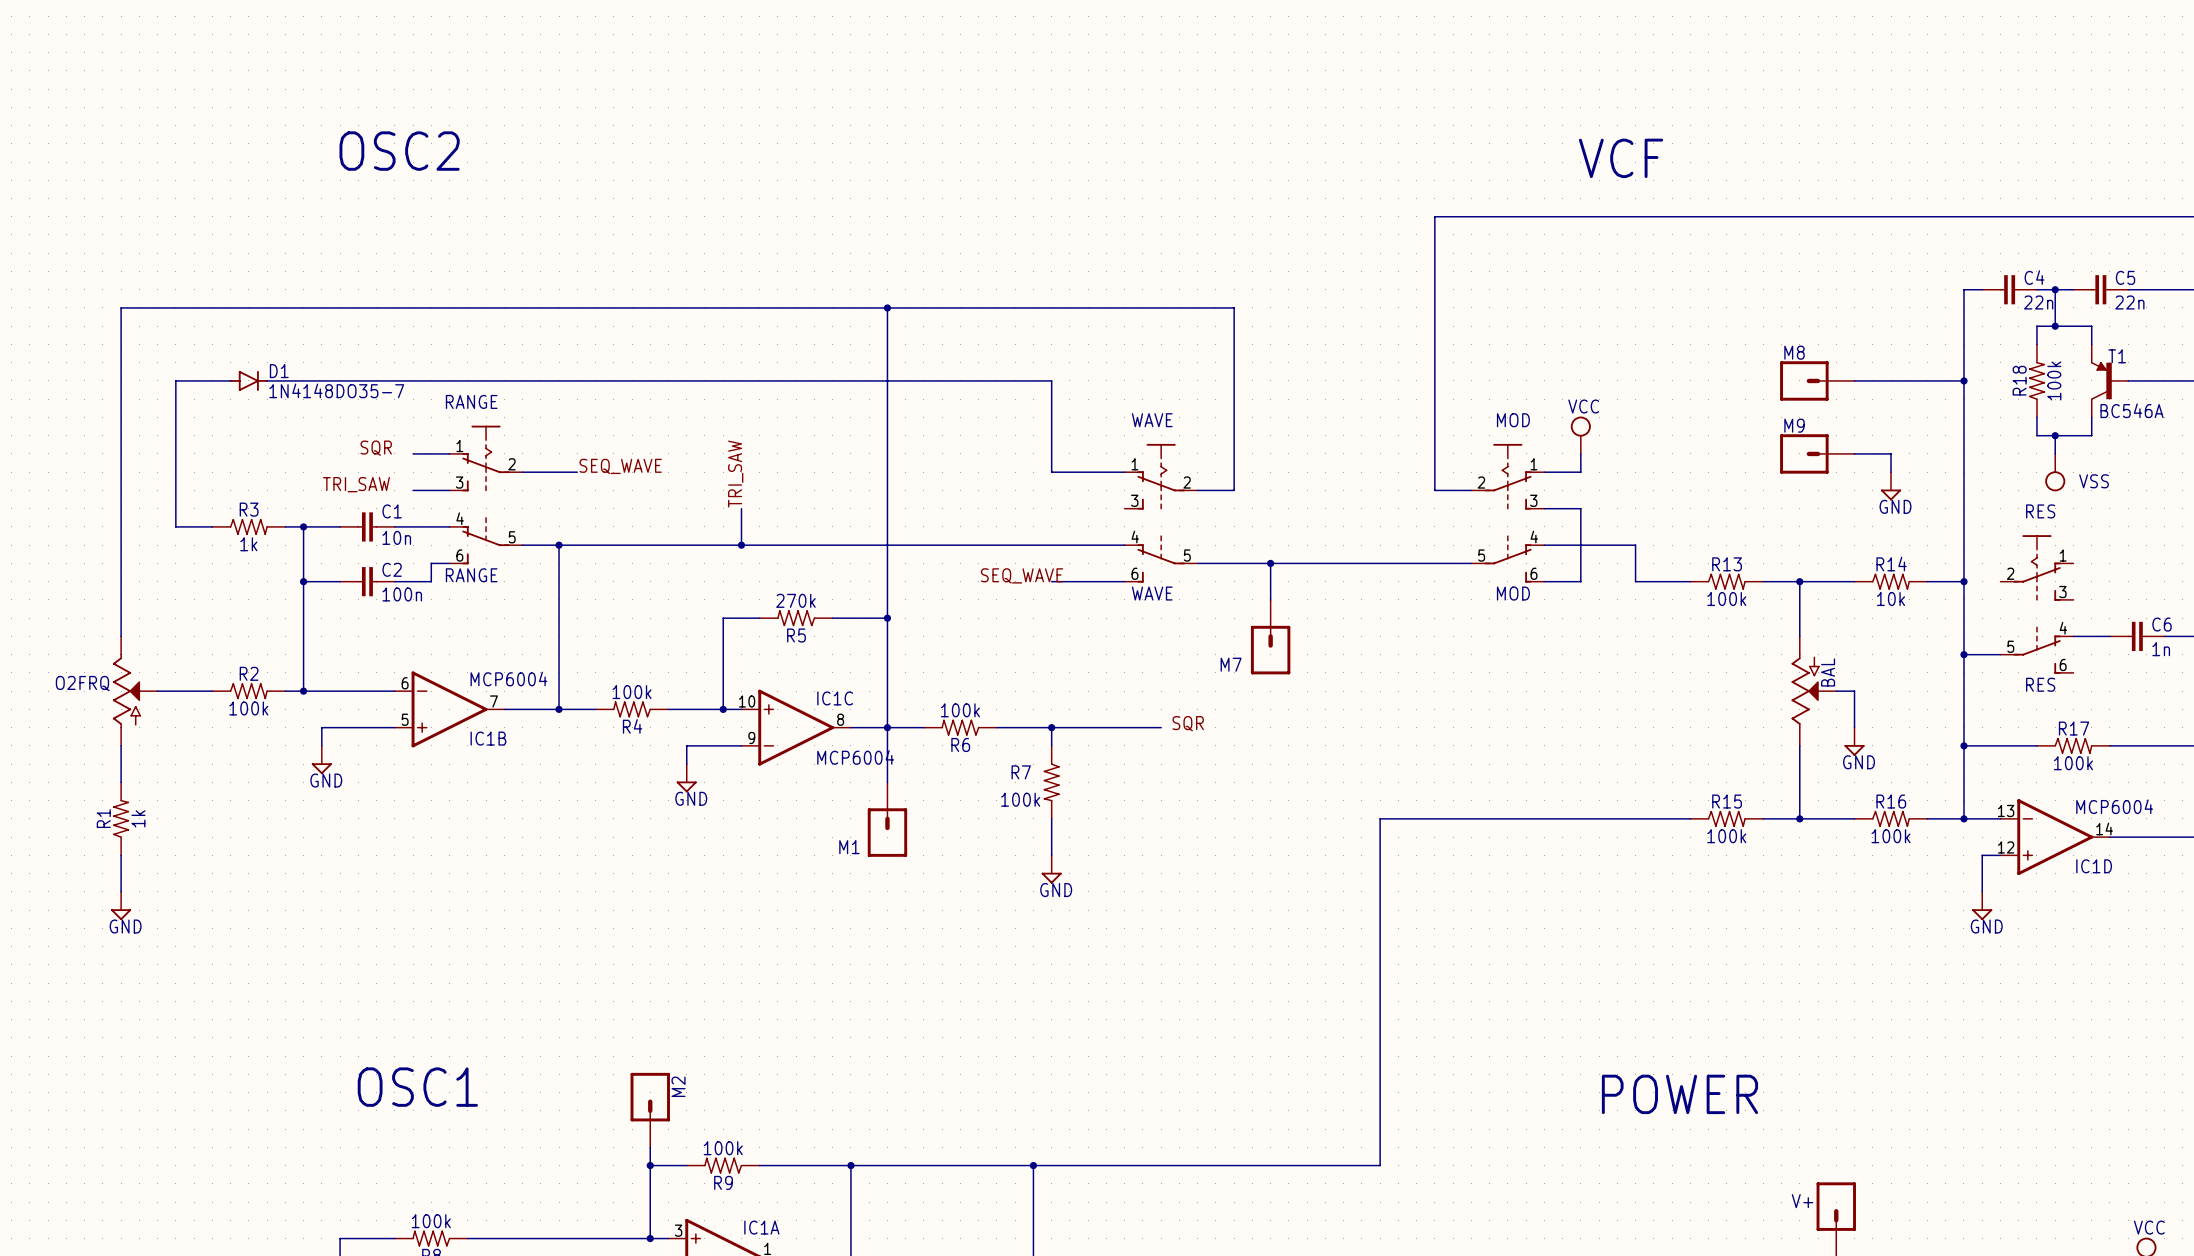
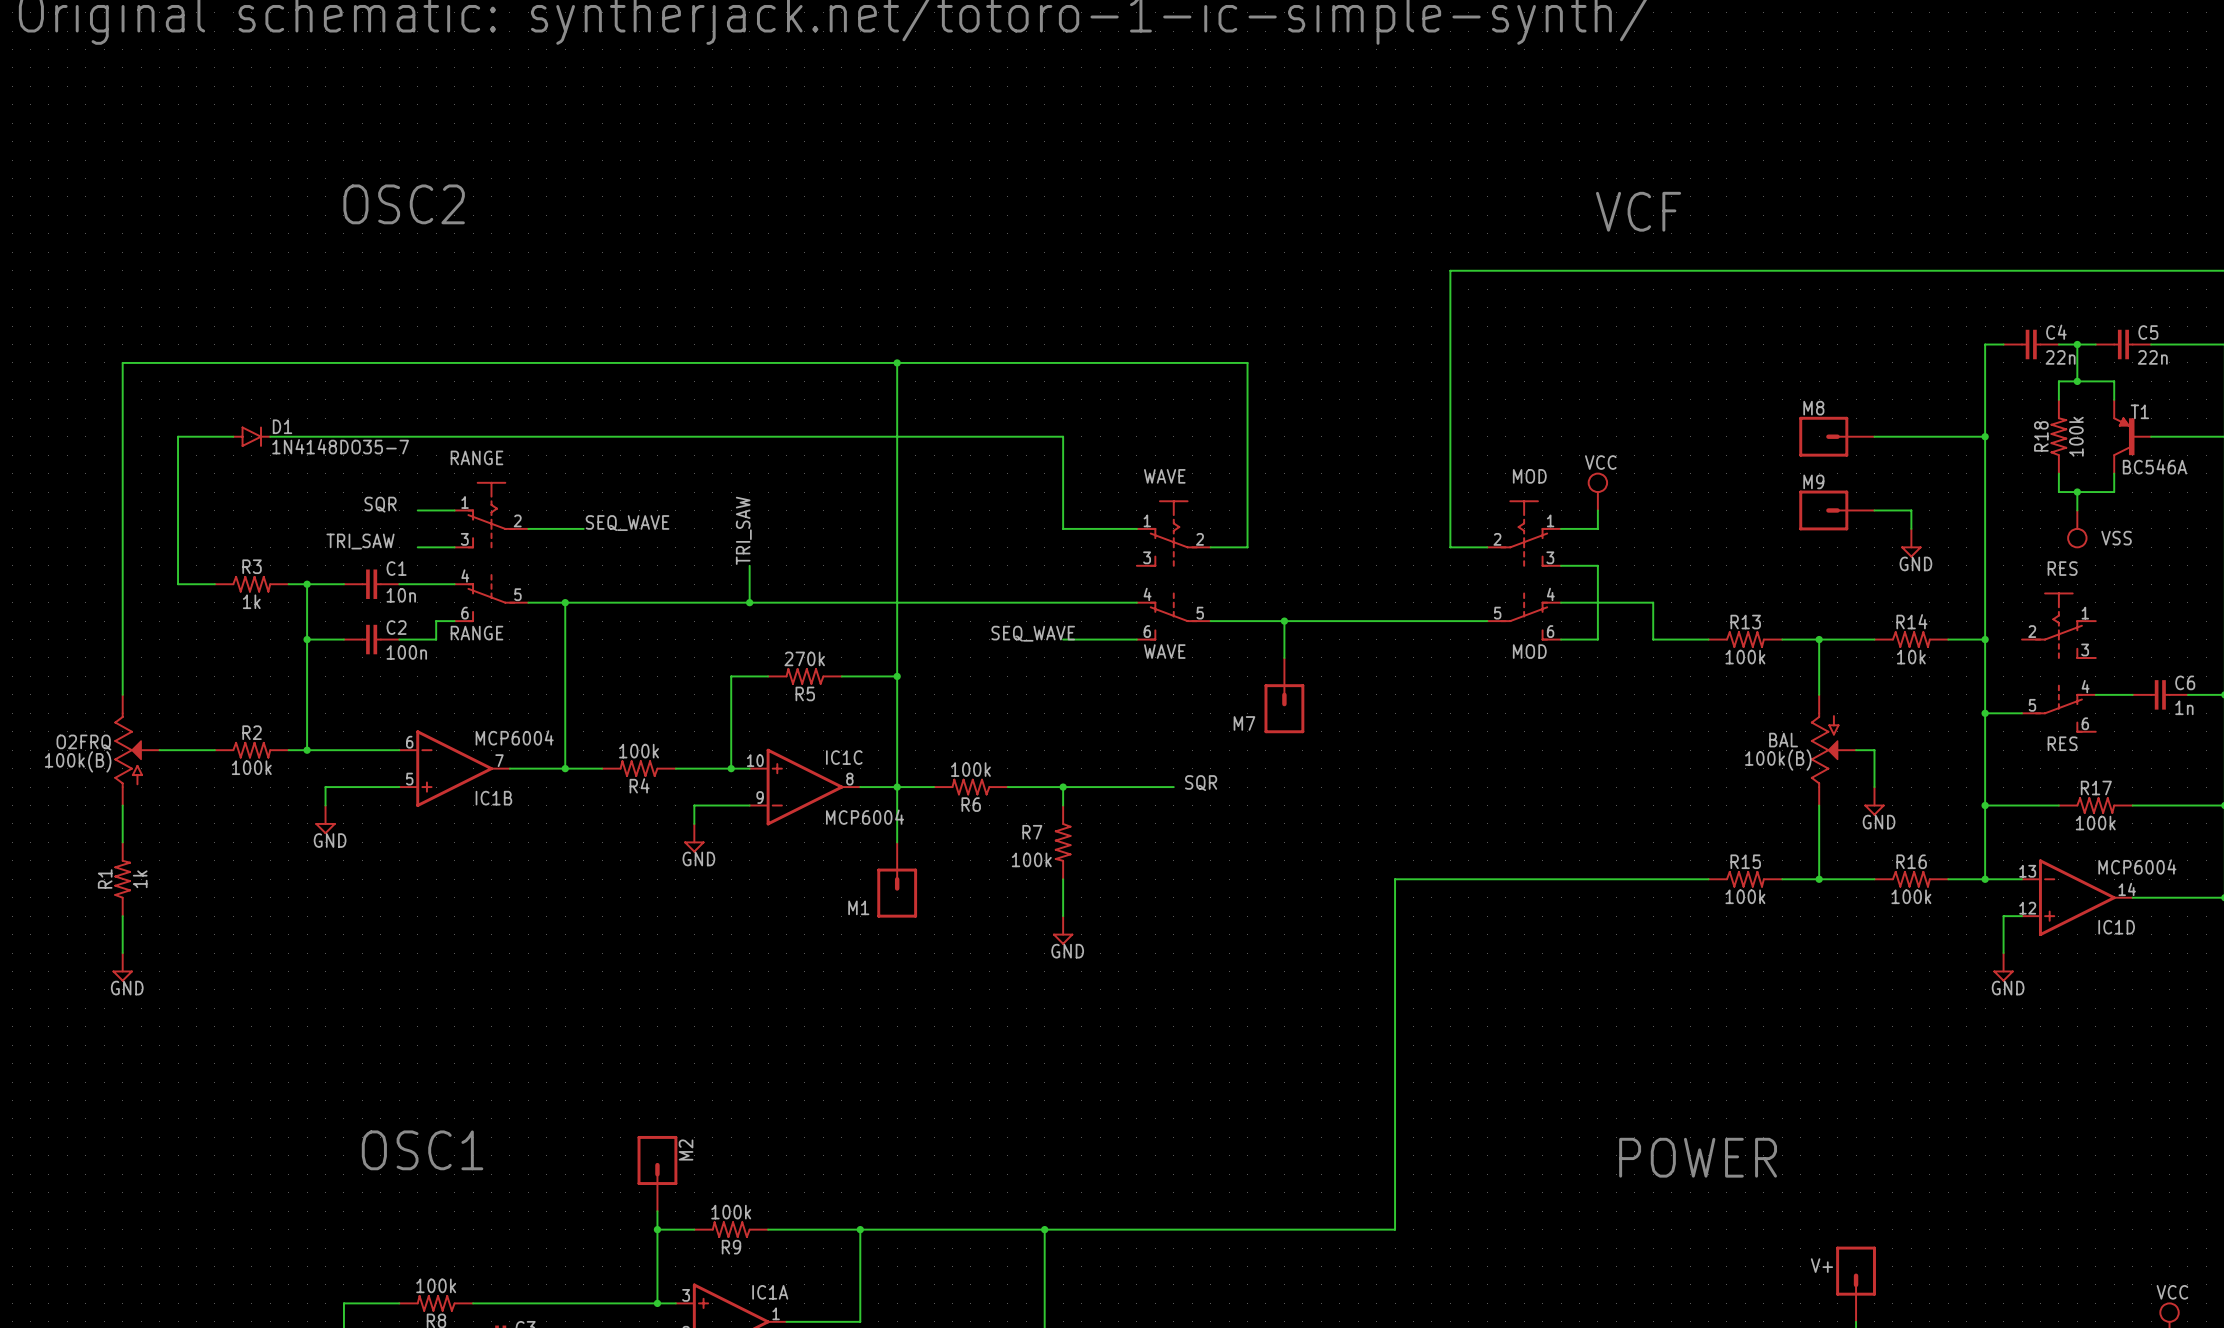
BAL name rotation: 0° (1828, 672) -> 90° clockwise (1783, 740)
BAL name position: BAL (1828, 672) -> BAL (1783, 740)
BAL value: none -> 100k(B) (1778, 760)
O2FRQ value: none -> 100k(B) (78, 761)

